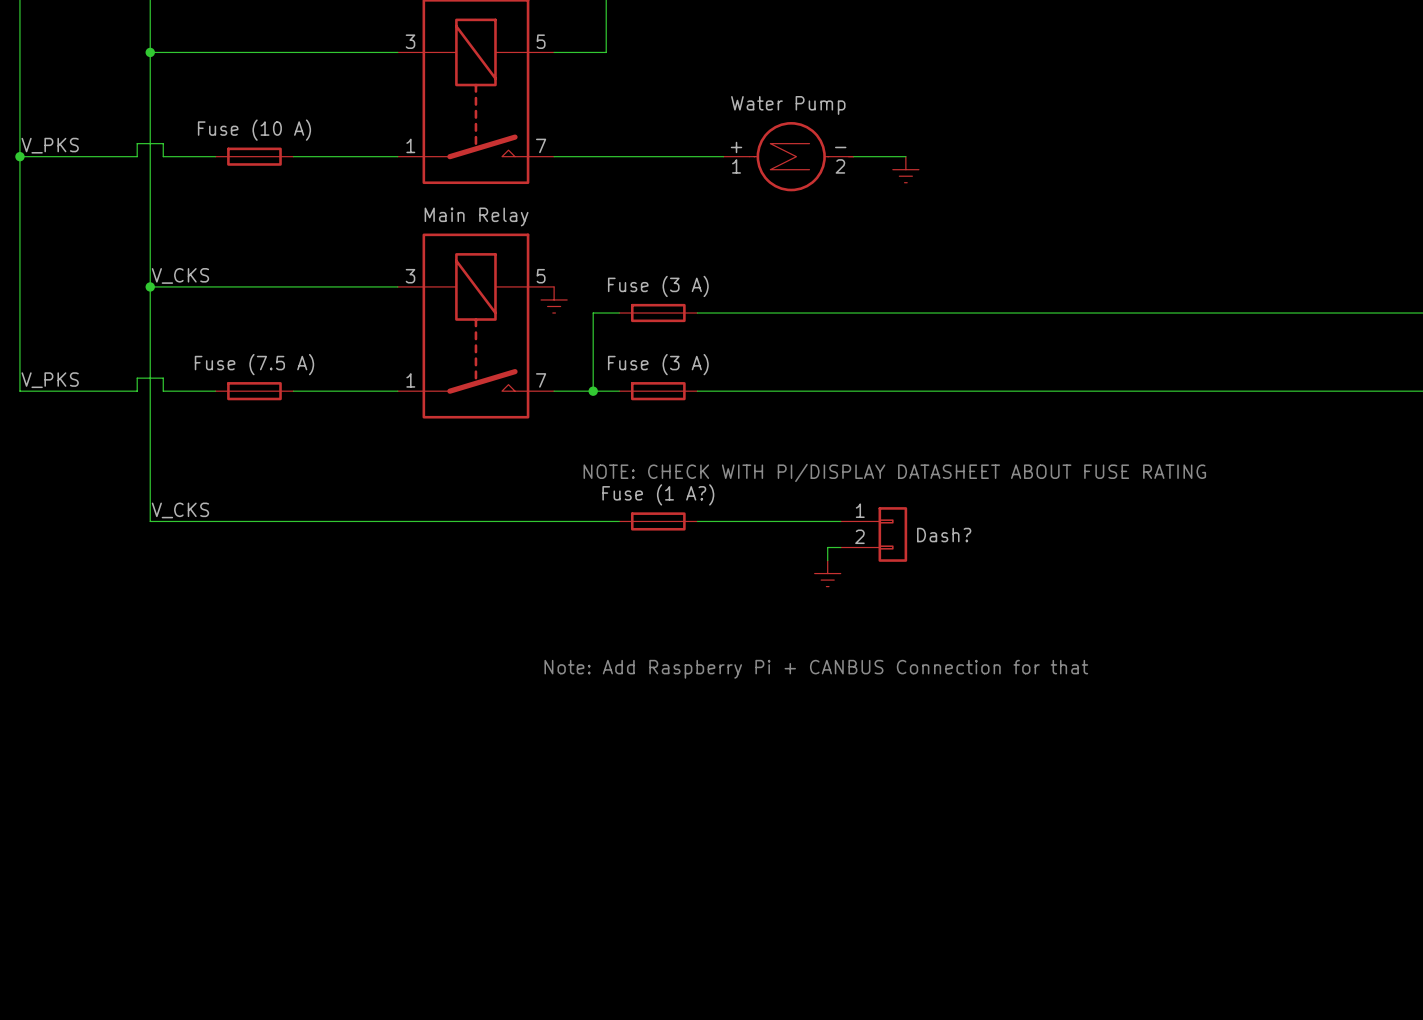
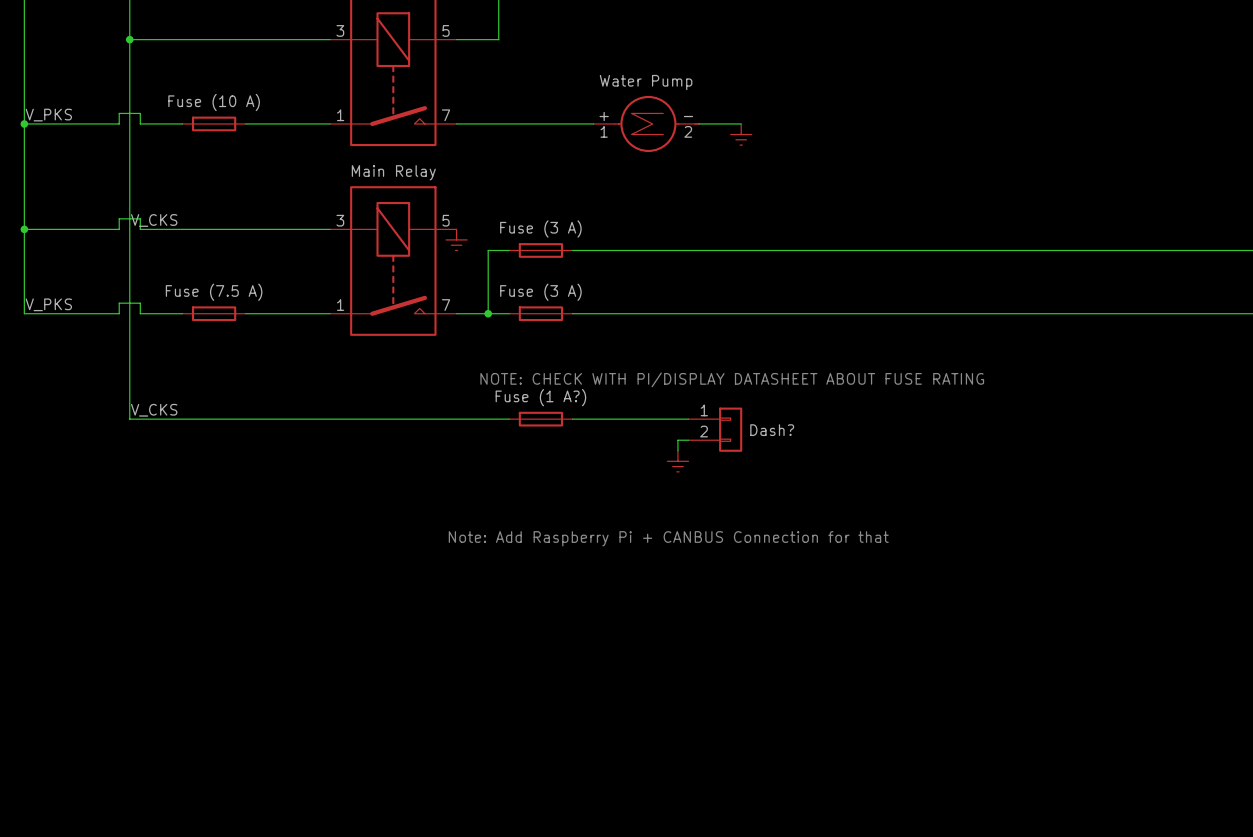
junction: none -> (24, 229)
wire: (150, 286) (163, 286) -> (24, 229) (119, 229) (119, 218) (140, 218) (140, 229)
junction: (150, 286) -> none

